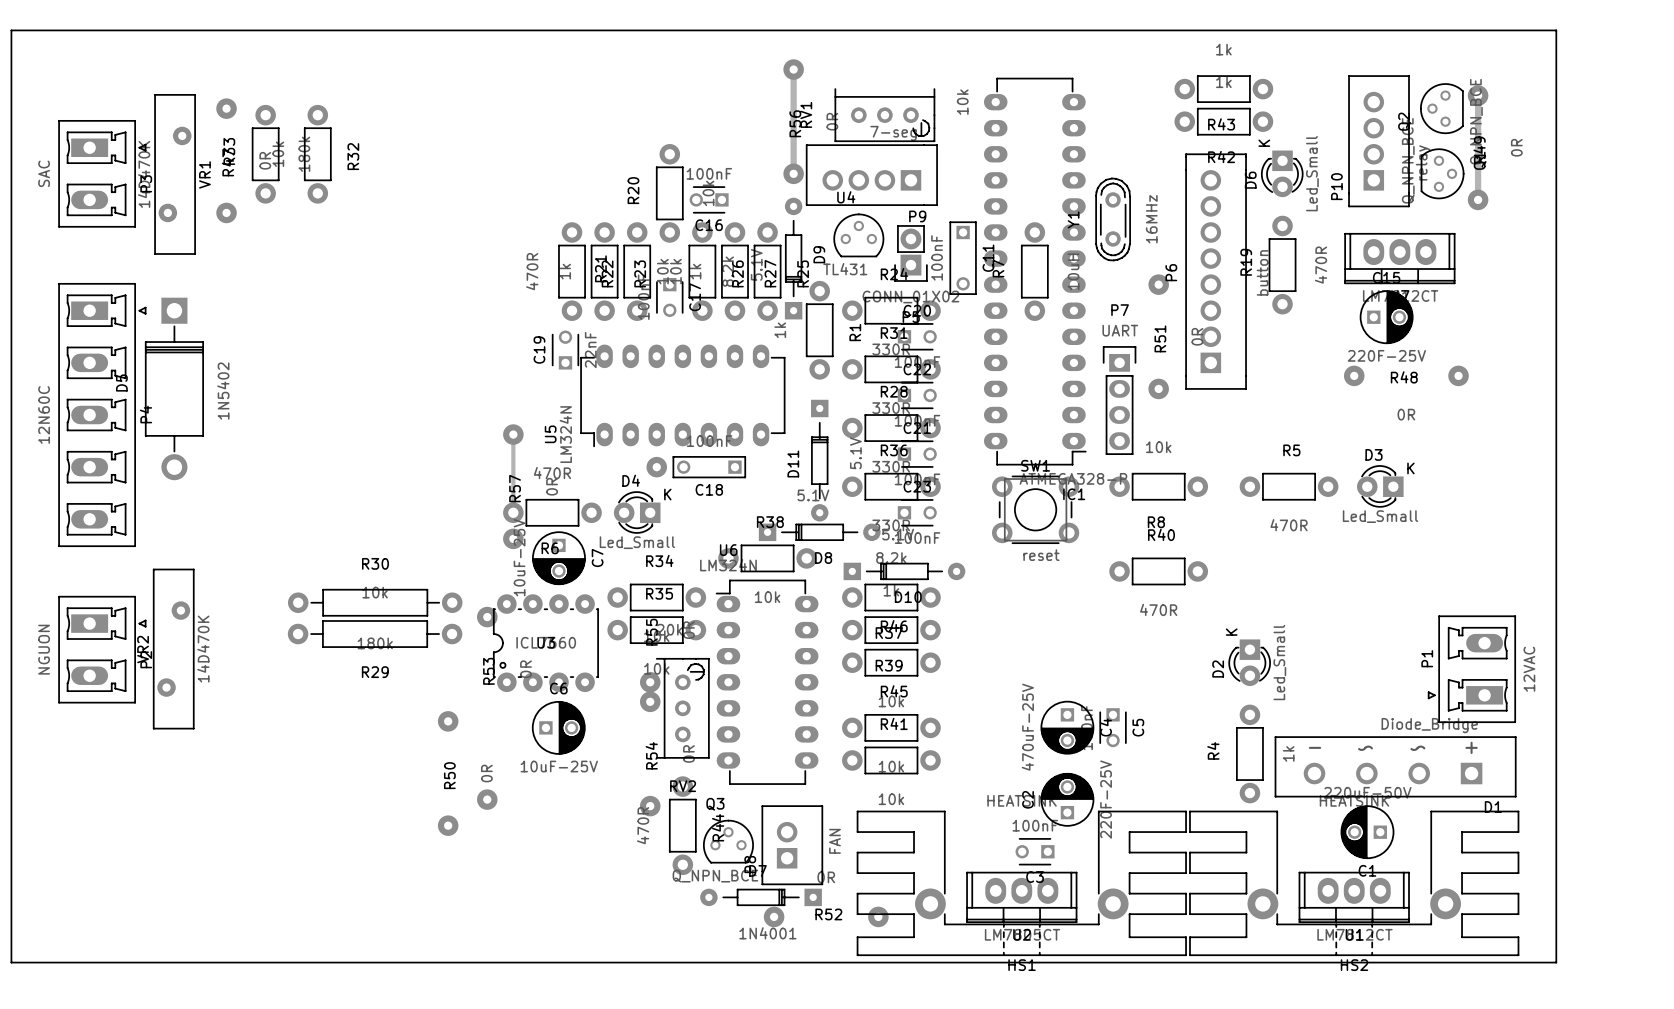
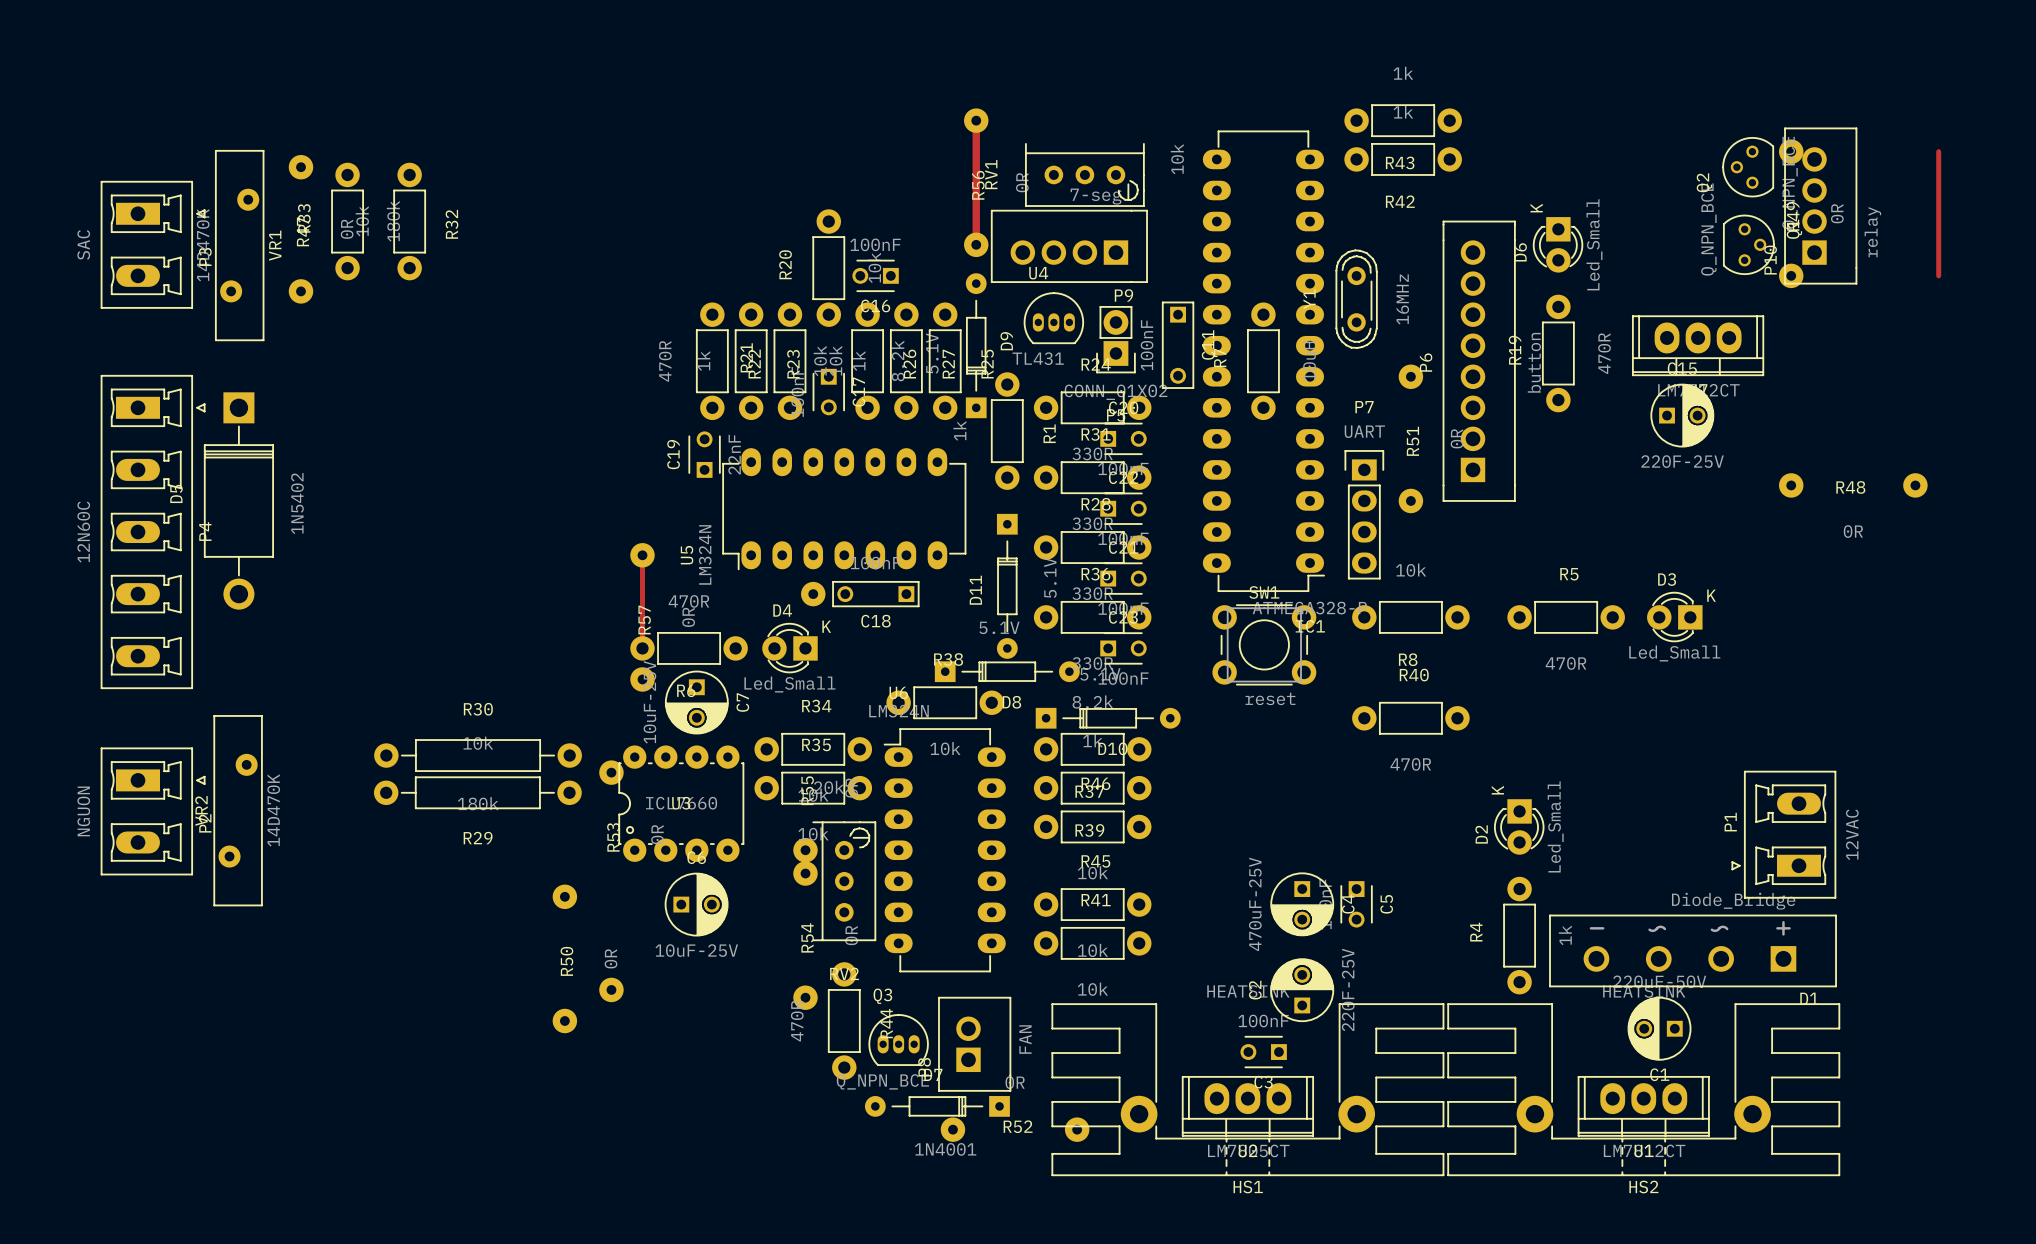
board edge: (11, 30) (1556, 30) (1556, 962) (11, 962) (11, 30) -> none
R43 position: (1223, 89) -> (1403, 120)
track: (1478, 95) (1478, 199) -> (1938, 151) (1938, 275)
R42 position: (1223, 121) -> (1403, 159)
P10 position: (1379, 141) -> (1820, 206)
U4 footprint: [833, 213, 885, 258] -> [1023, 292, 1085, 345]
R48 position: (1406, 375) -> (1853, 485)
Q3 footprint: [703, 819, 754, 864] -> [868, 1014, 929, 1066]

